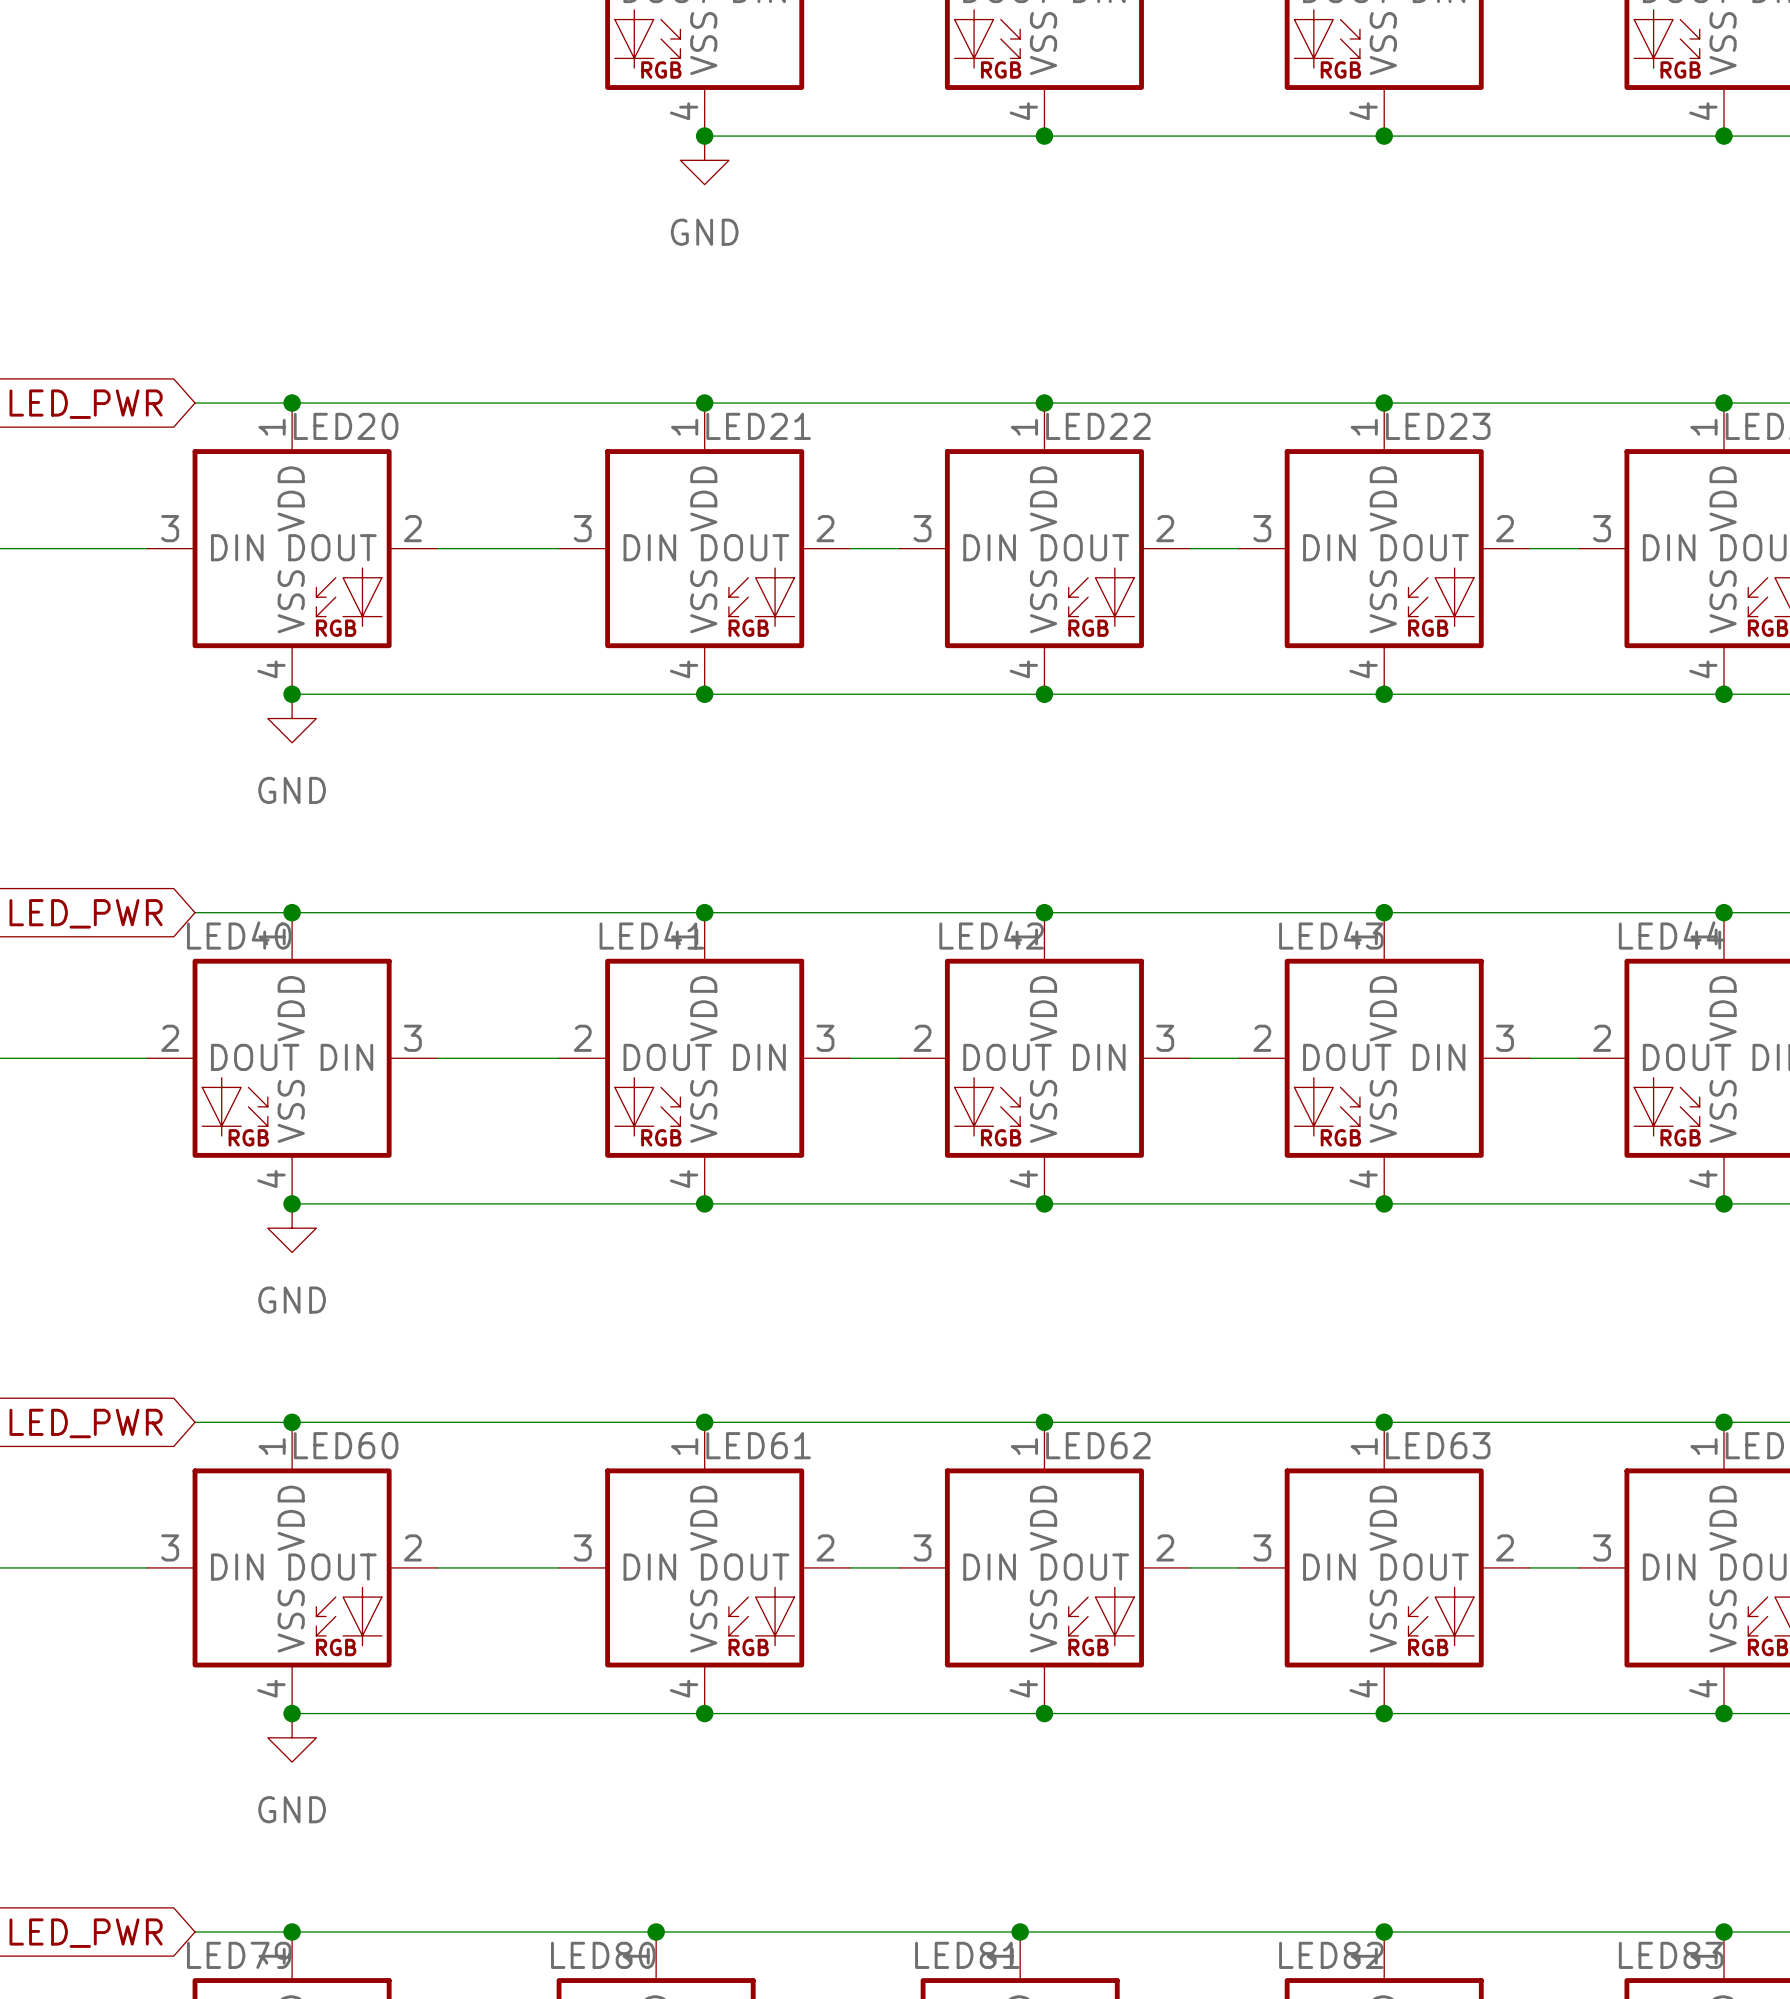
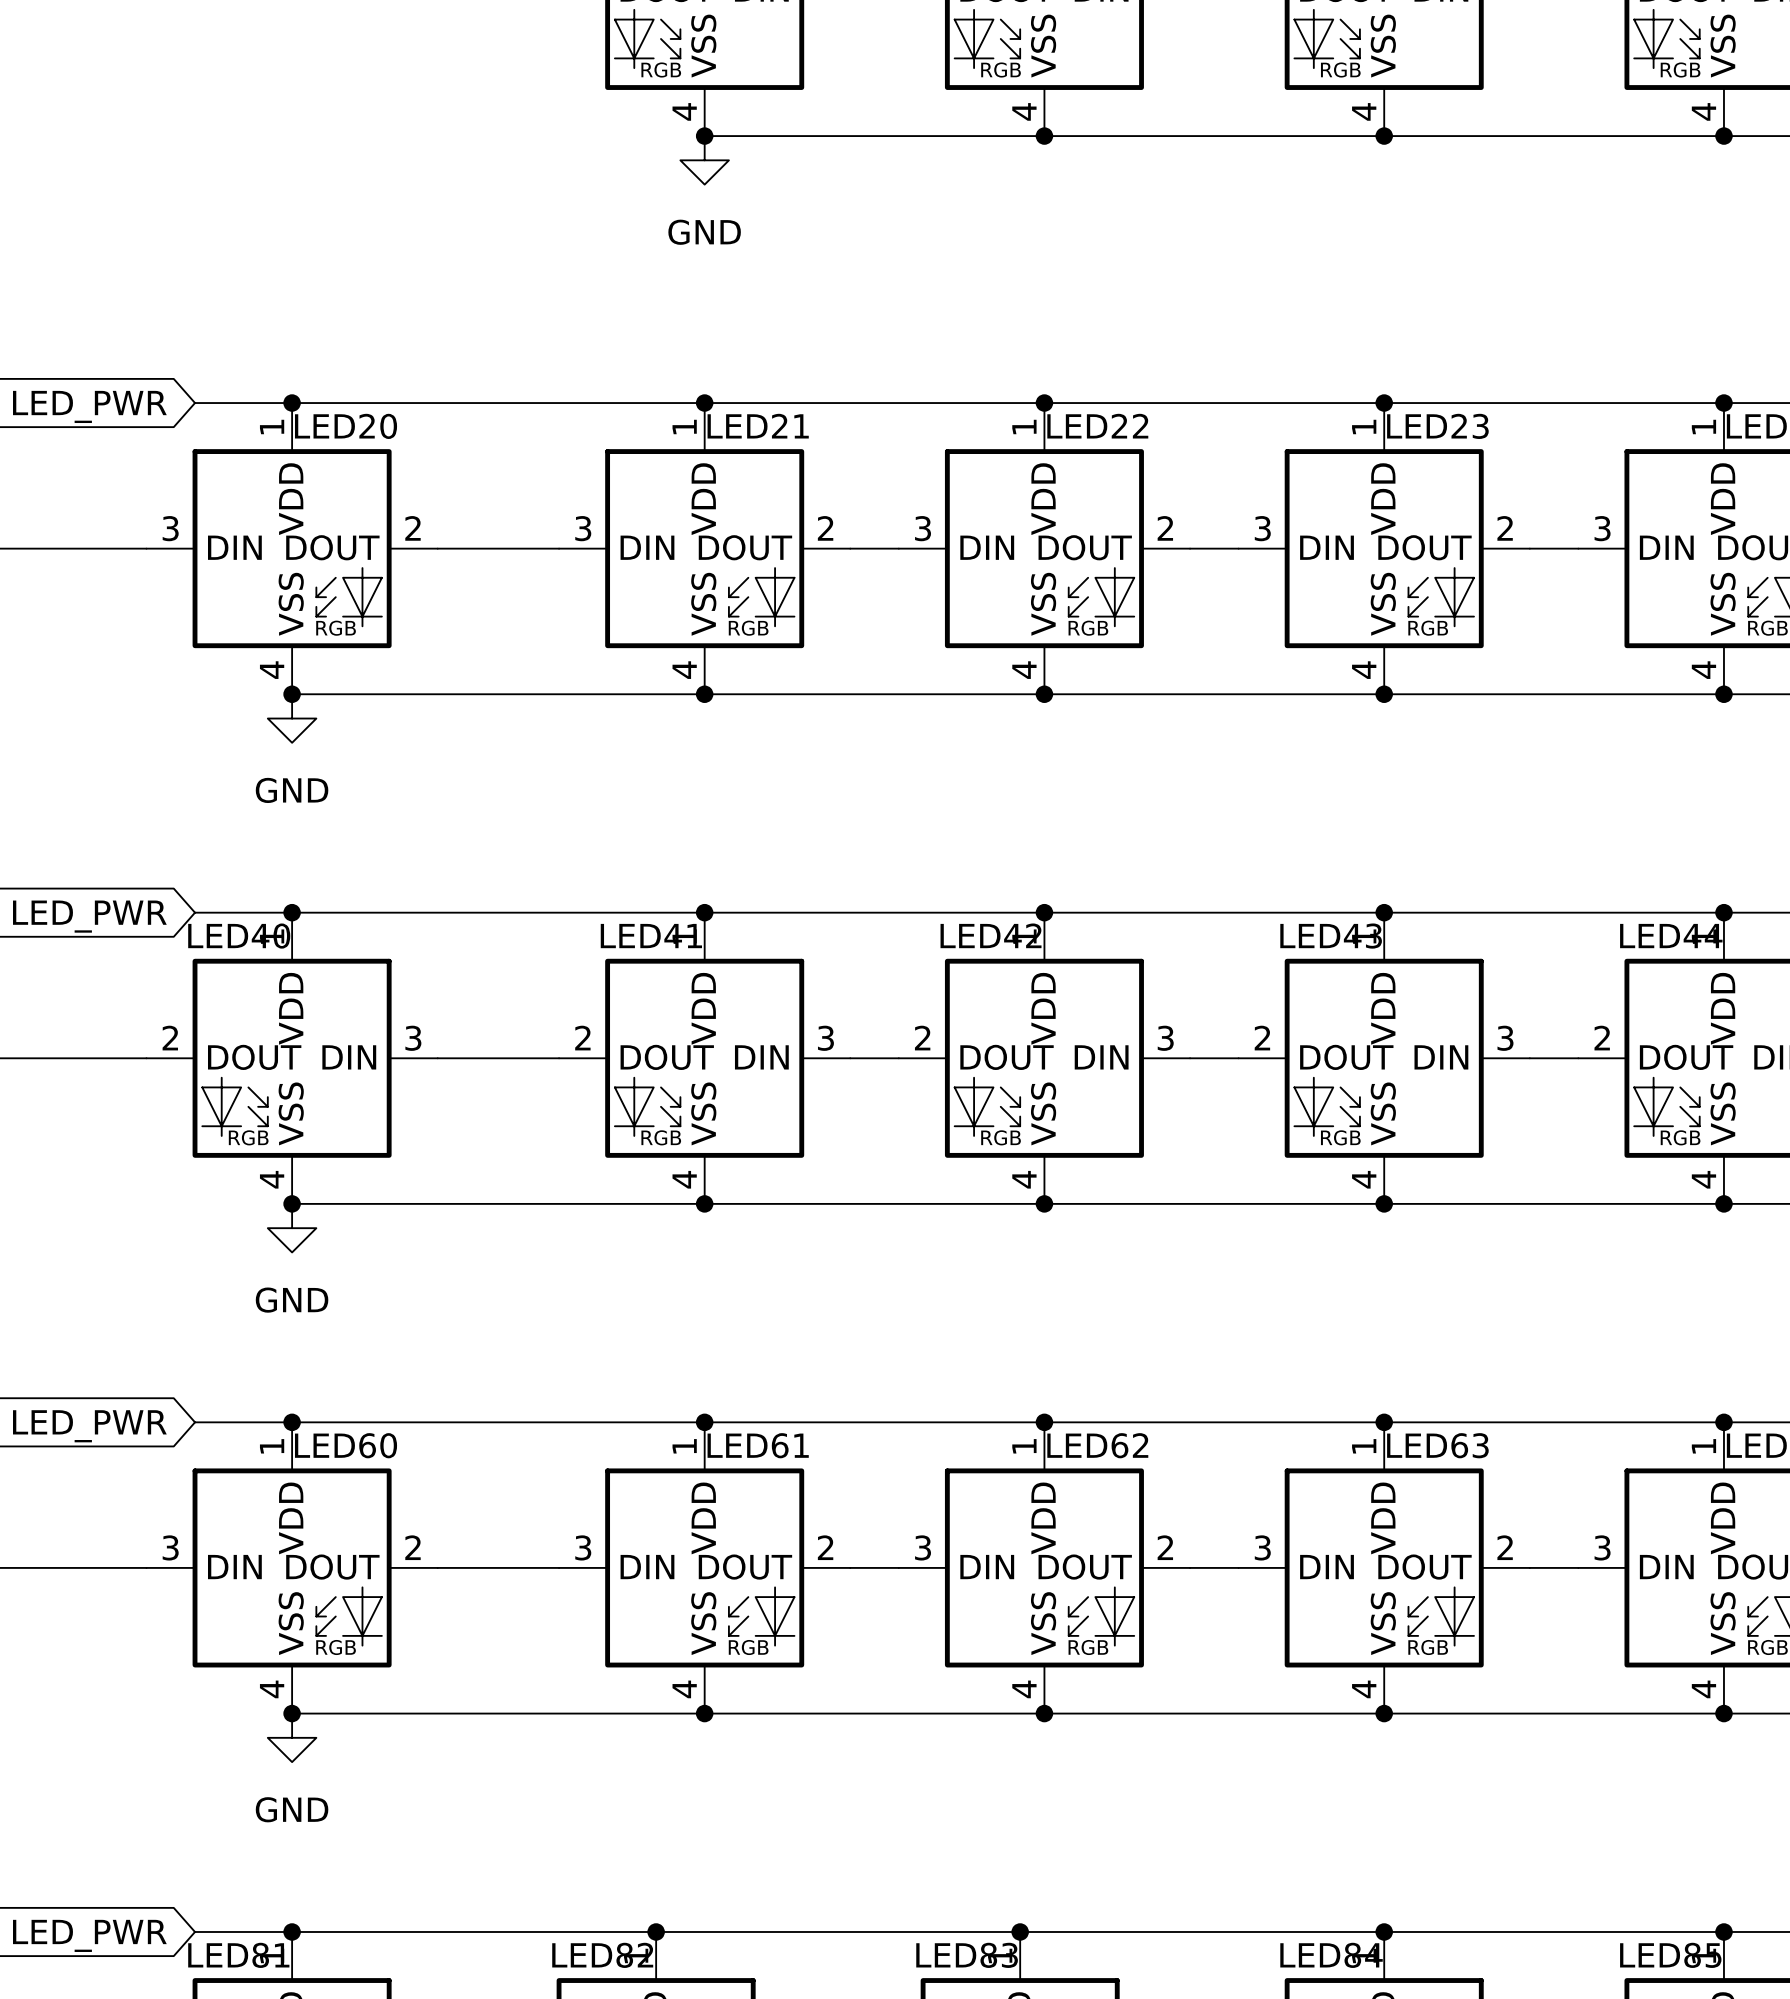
LED79 name: LED79 (239, 1955) -> LED81 (238, 1955)
LED80 name: LED80 (603, 1955) -> LED82 (602, 1955)
LED81 name: LED81 (967, 1955) -> LED83 (967, 1955)
LED82 name: LED82 (1331, 1955) -> LED84 (1331, 1955)
LED83 name: LED83 (1671, 1955) -> LED85 (1670, 1955)

